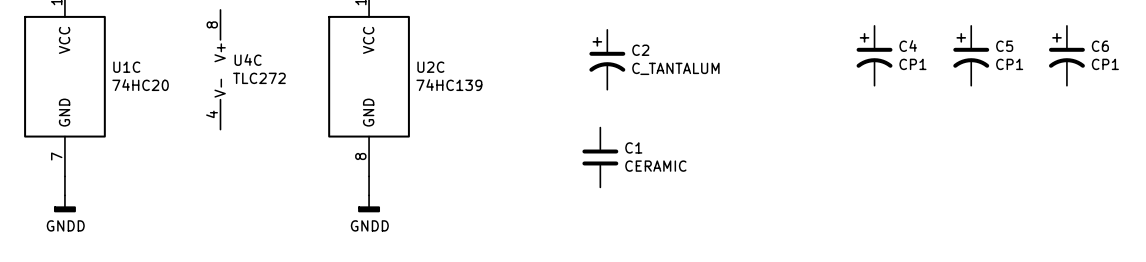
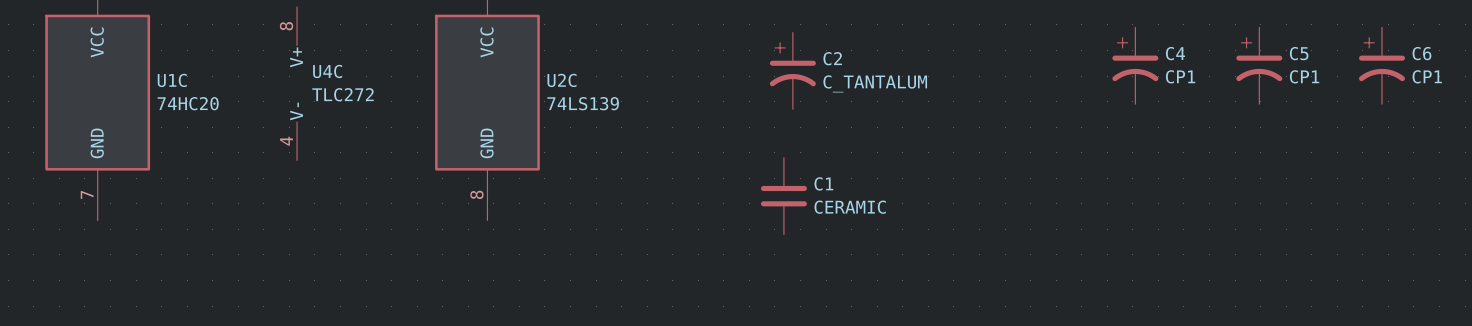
U2C value: 74HC139 (449, 85) -> 74LS139 (583, 103)
wire: (64, 176) (64, 195) -> none
wire: (369, 176) (369, 195) -> none
power symbol: GNDD (64, 203) -> none
power symbol: GNDD (369, 203) -> none

